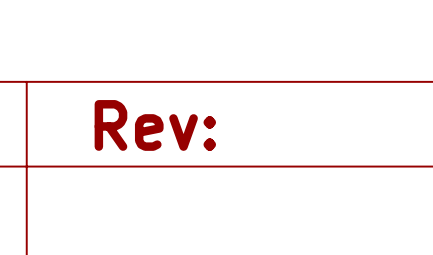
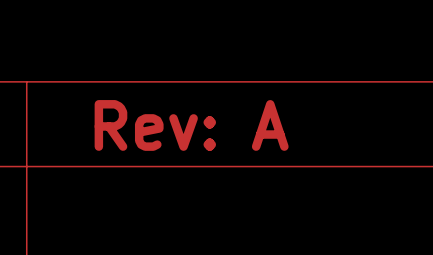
title block: Rev: (155, 125) -> Rev: A (191, 125)

